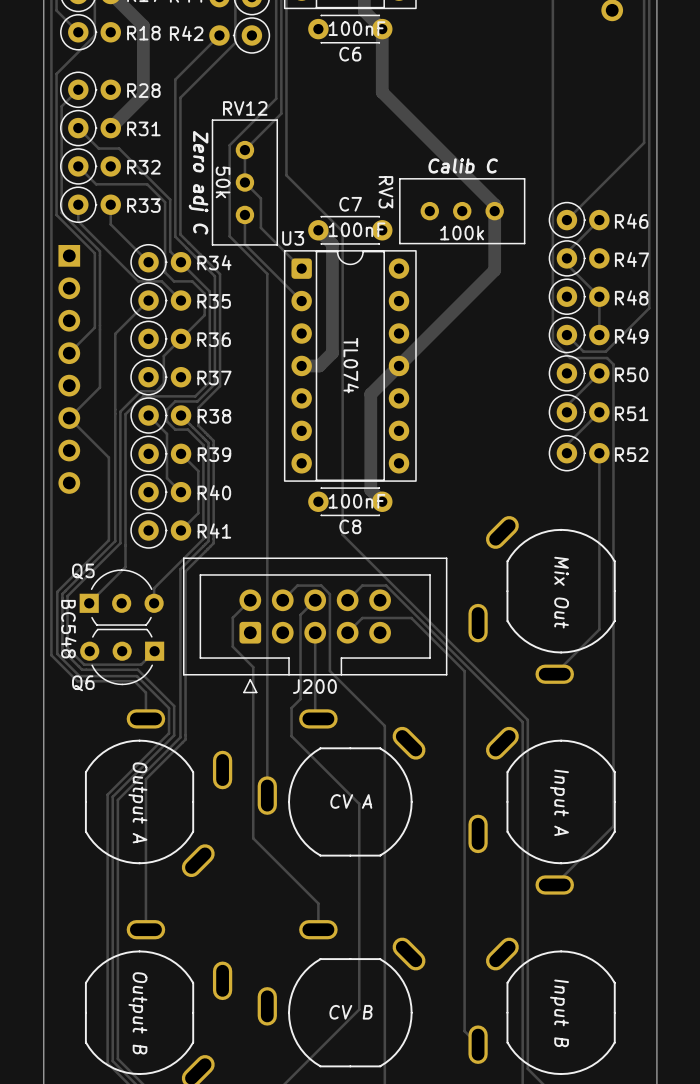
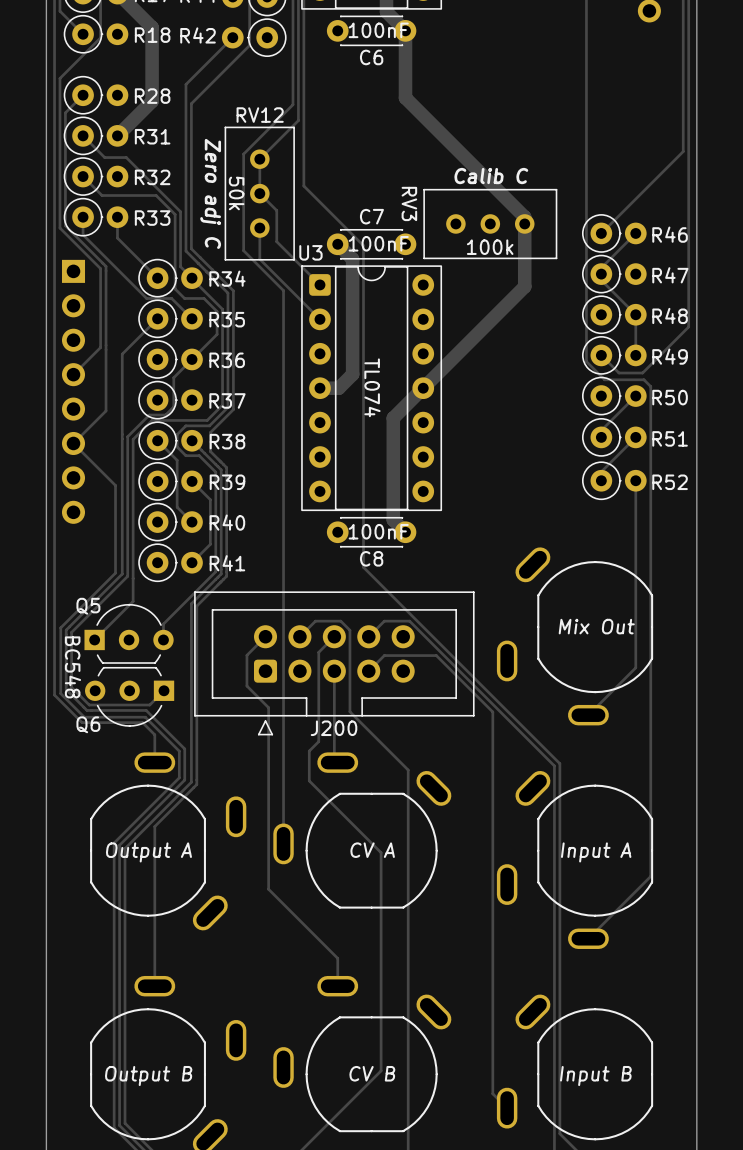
part text rotation: 0° (561, 592) -> 90° counterclockwise (596, 626)
part text rotation: 0° (137, 802) -> 90° counterclockwise (148, 852)
part text rotation: 0° (559, 802) -> 90° counterclockwise (596, 852)
part text rotation: 0° (137, 1013) -> 90° counterclockwise (148, 1076)
part text rotation: 0° (559, 1013) -> 90° counterclockwise (595, 1076)

